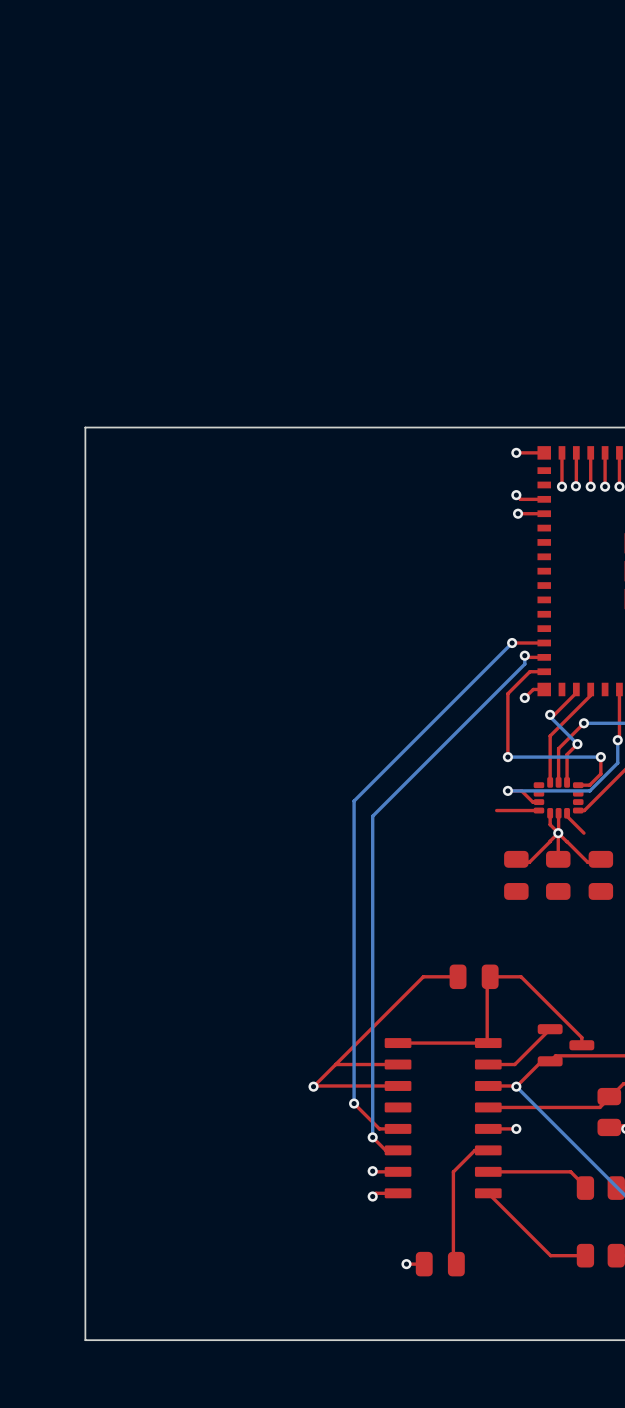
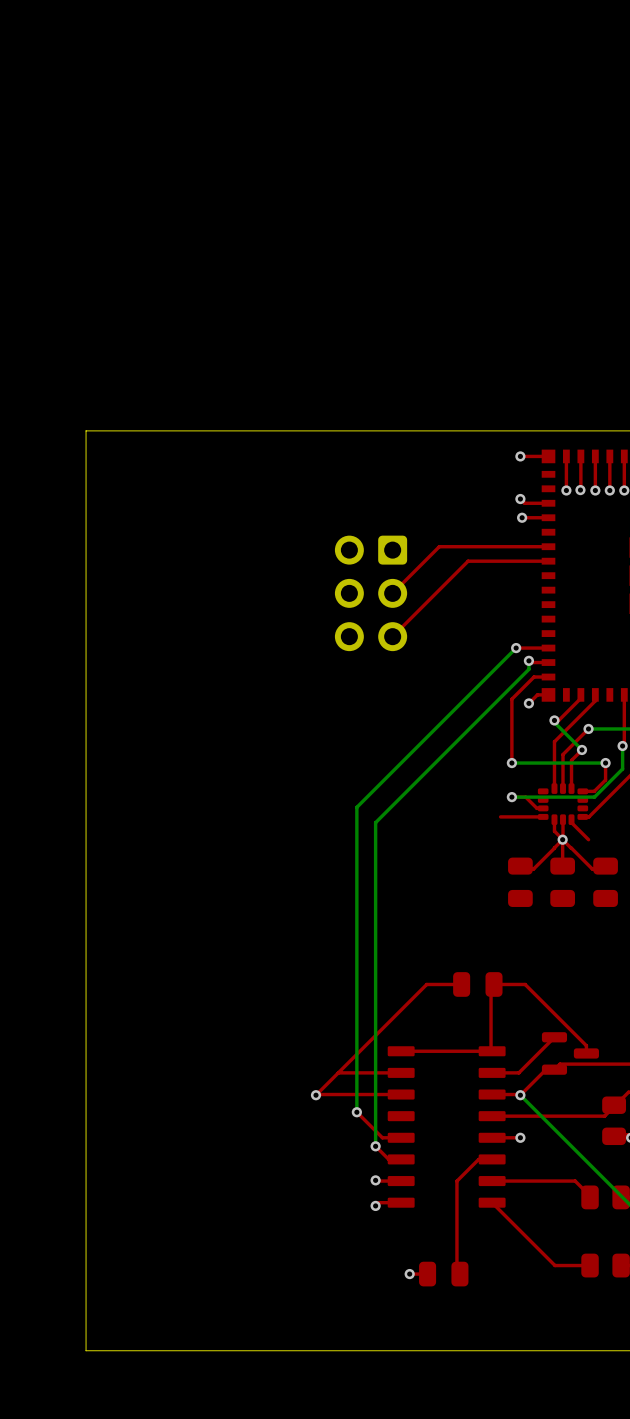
top track: none -> (548, 546) (439, 546) (392, 593)
top track: none -> (548, 561) (468, 561) (392, 636)
part: none -> (371, 593)

